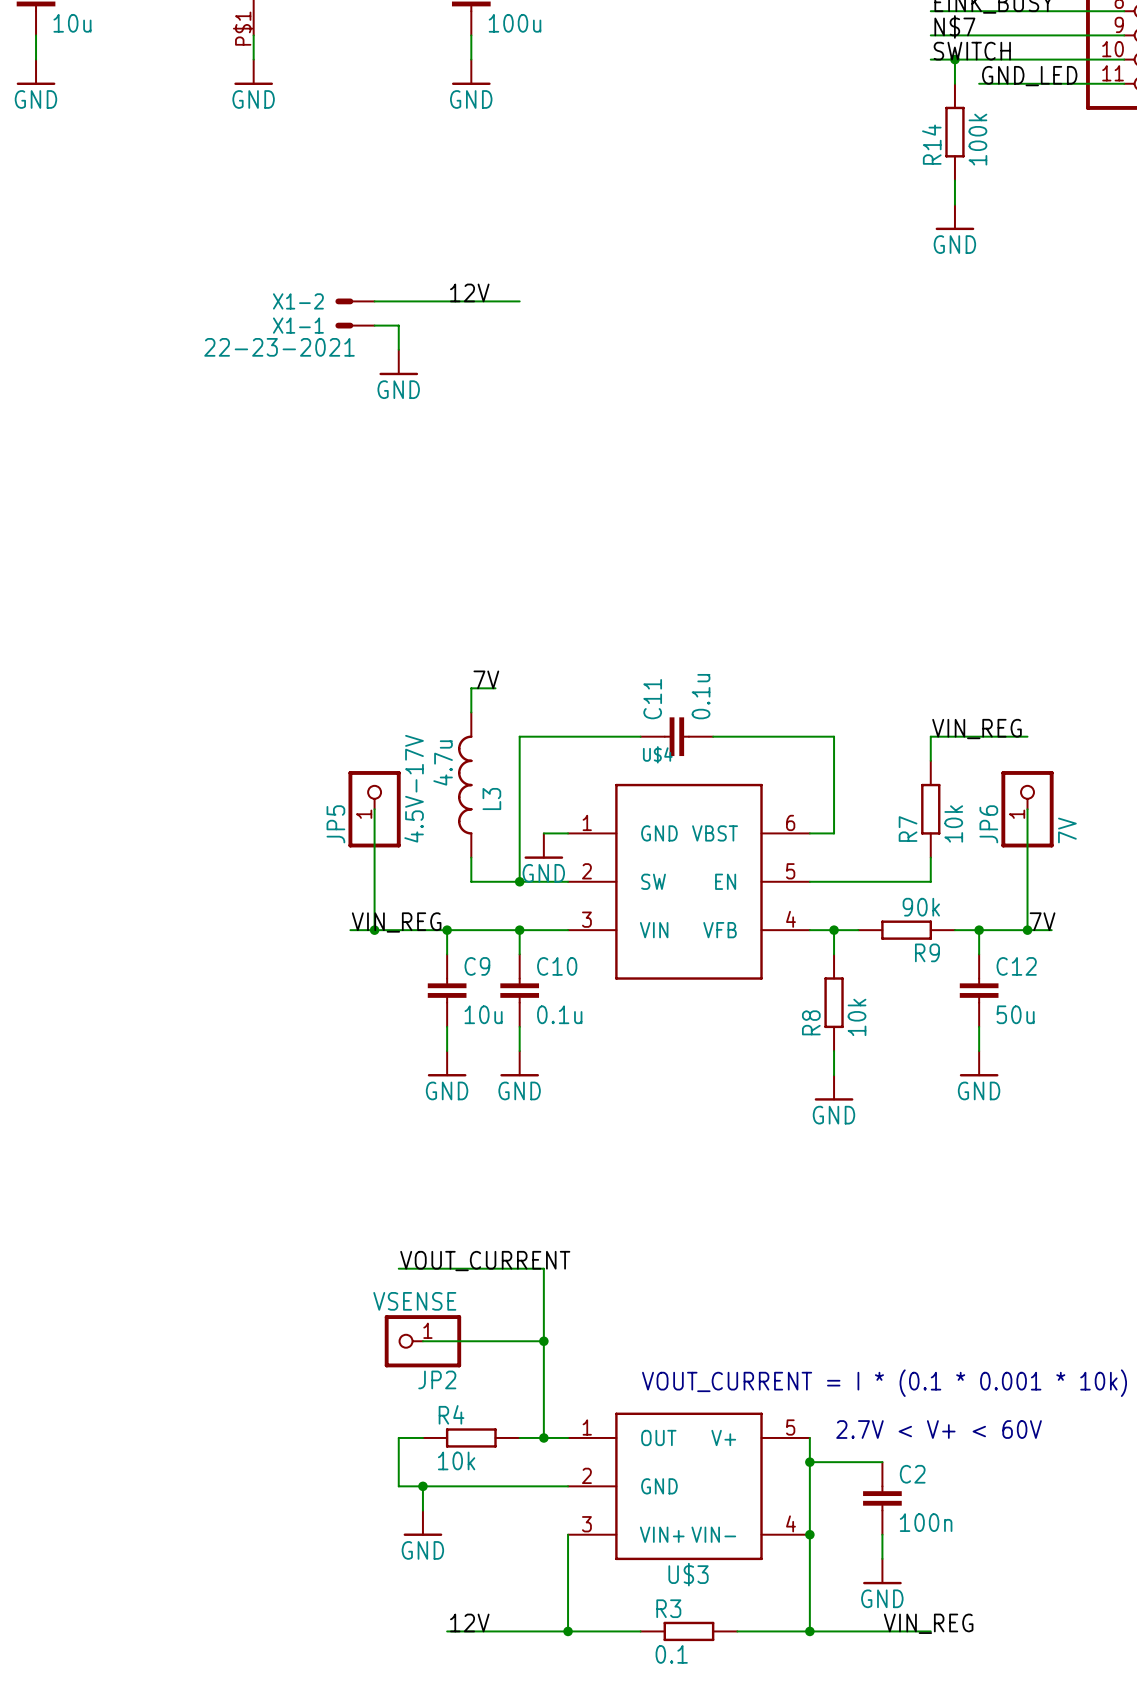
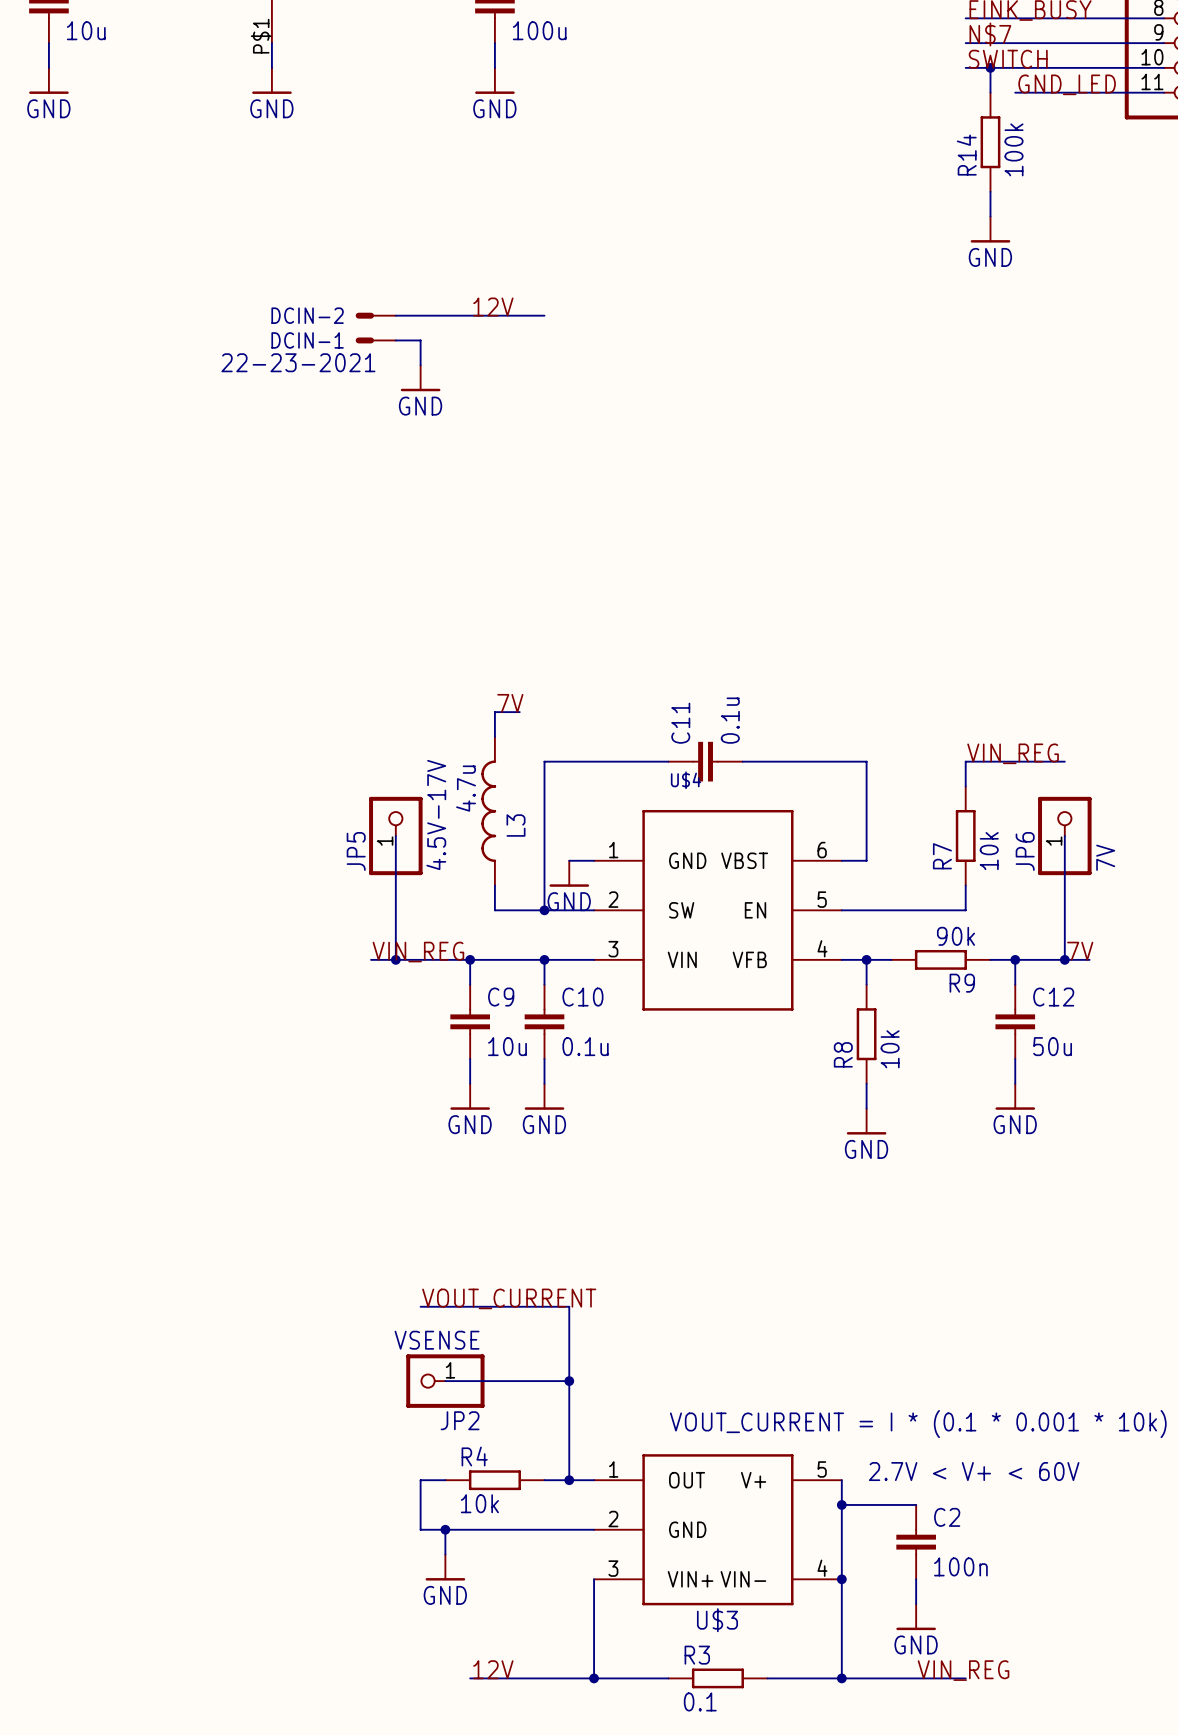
X1-2 name: X1-2 (298, 301) -> DCIN-2 (307, 315)
X1-1 name: X1-1 (298, 325) -> DCIN-1 (307, 340)

